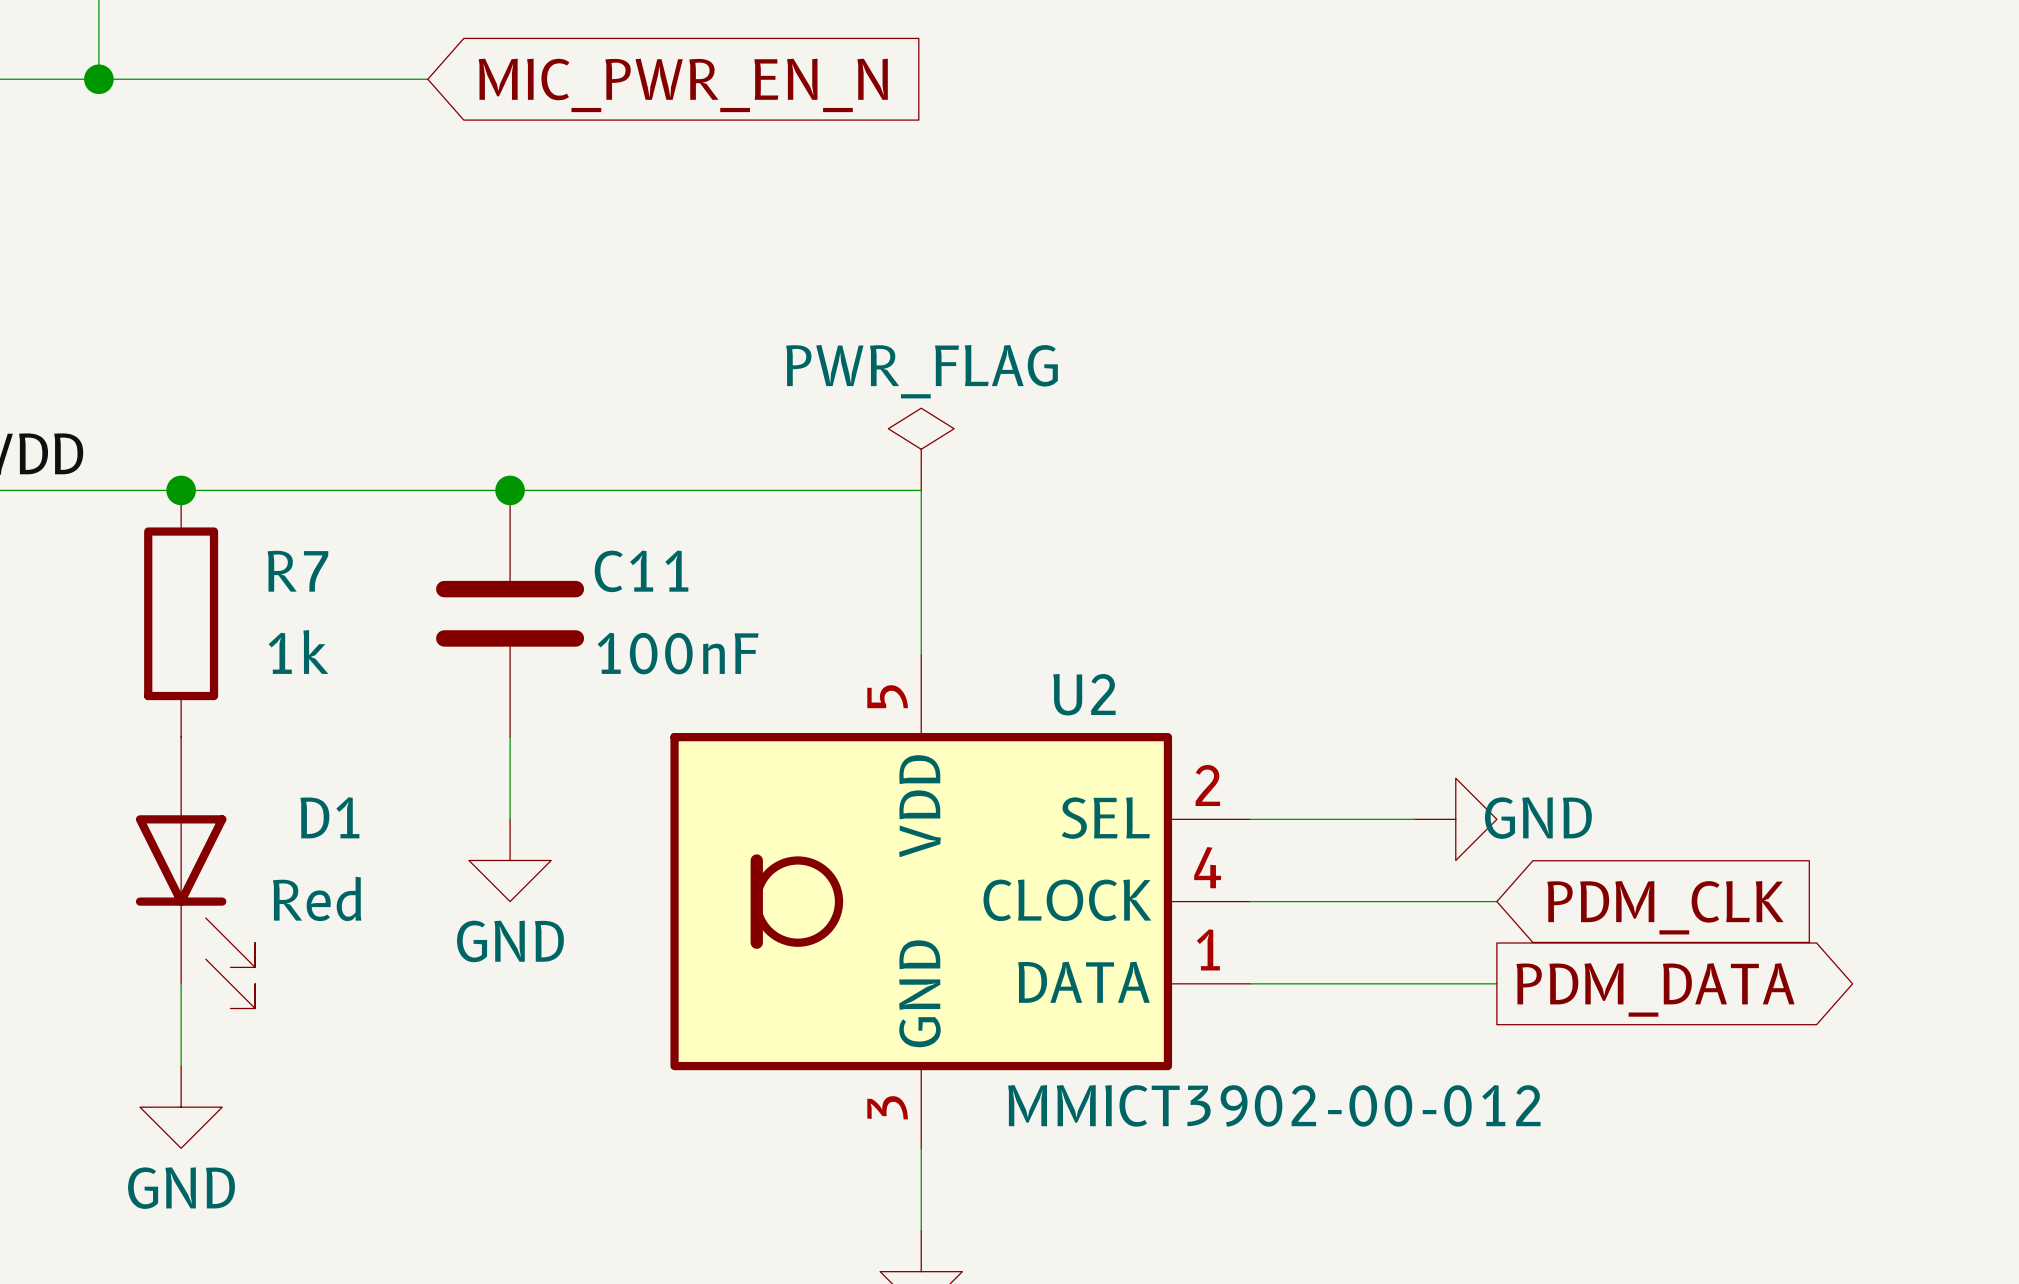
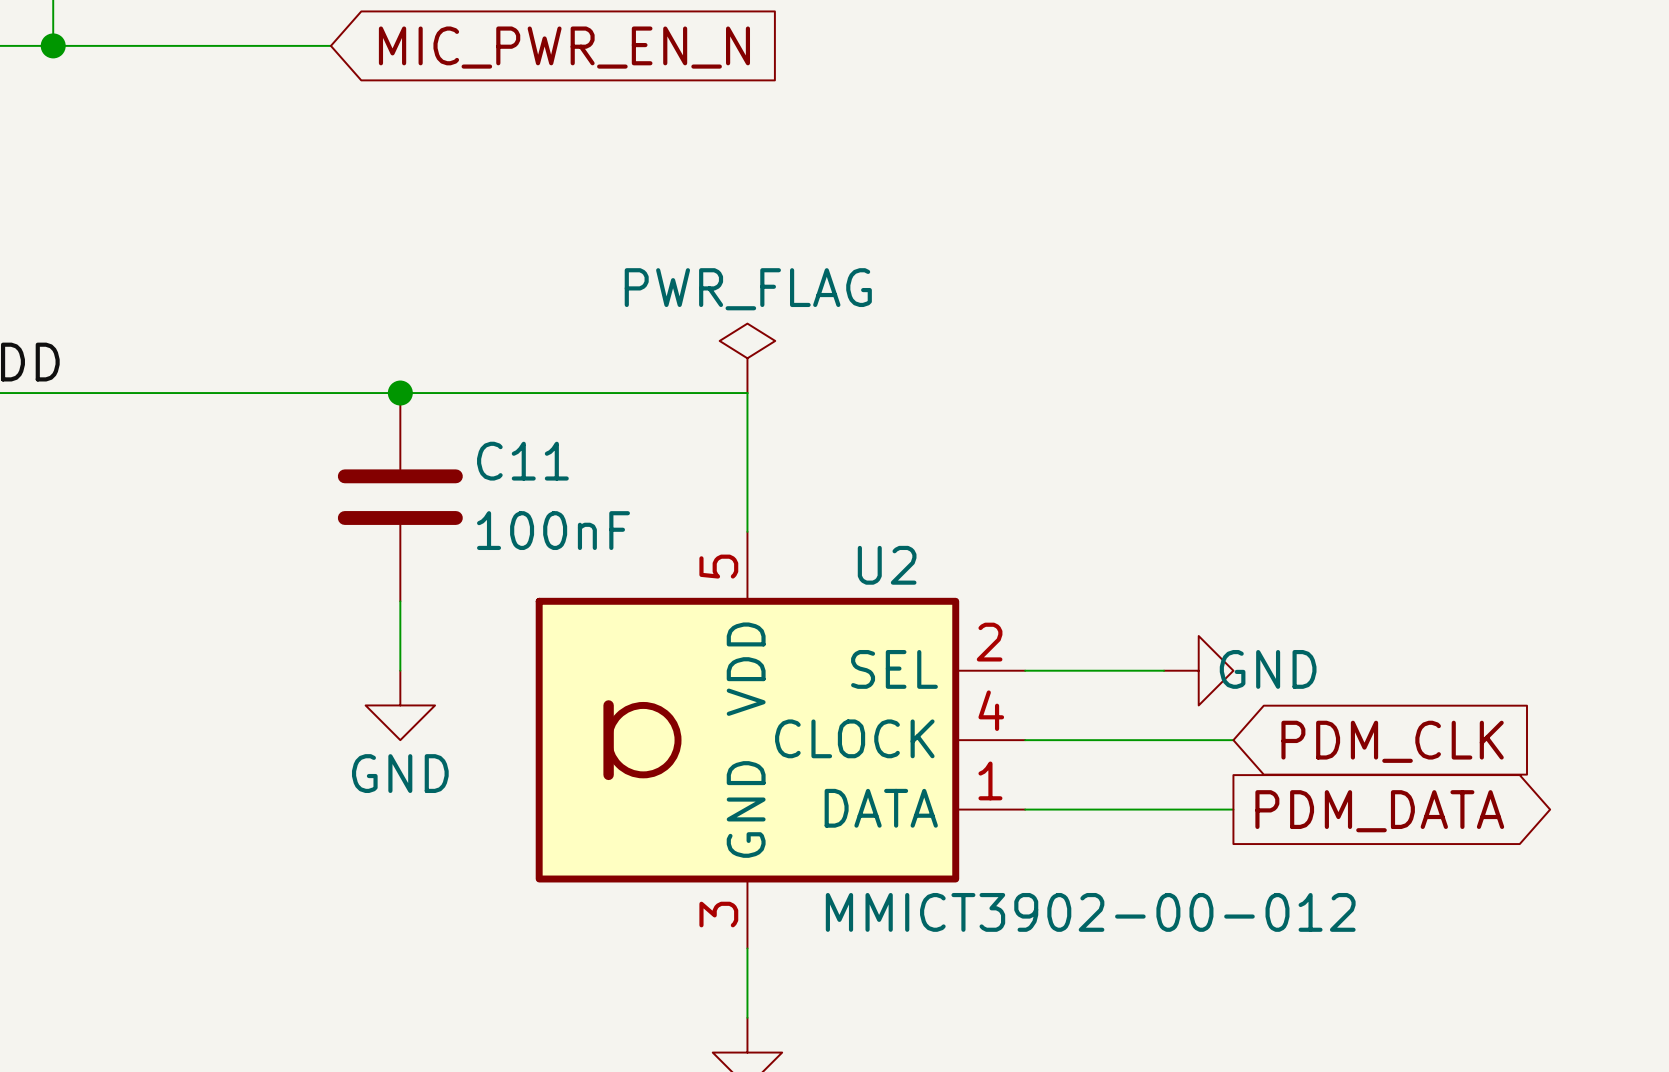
junction: (181, 490) -> none
R7: 1k (181, 613) -> none
D1: Red (195, 872) -> none
wire: (181, 983) (181, 1066) -> none
power symbol: GND (181, 1107) -> none

